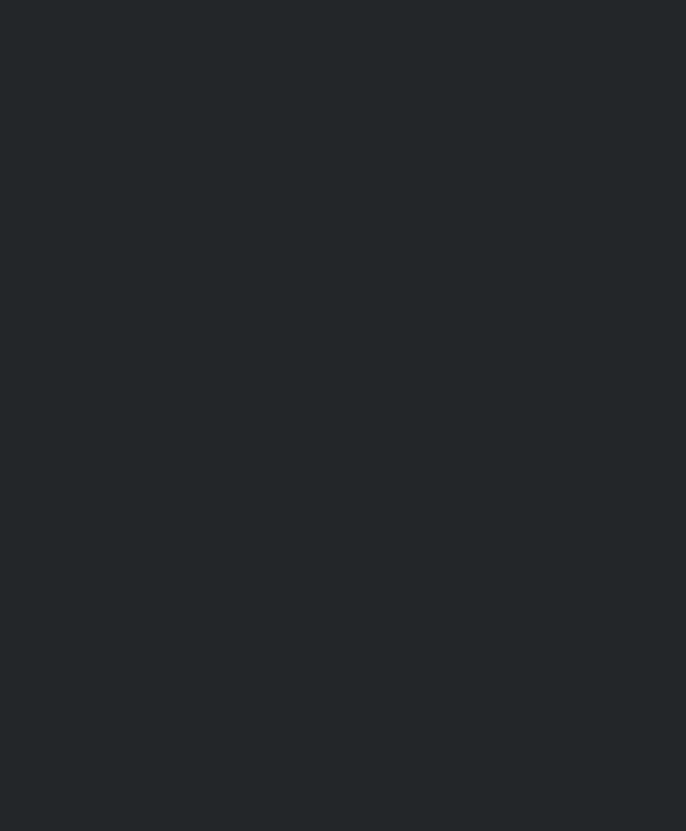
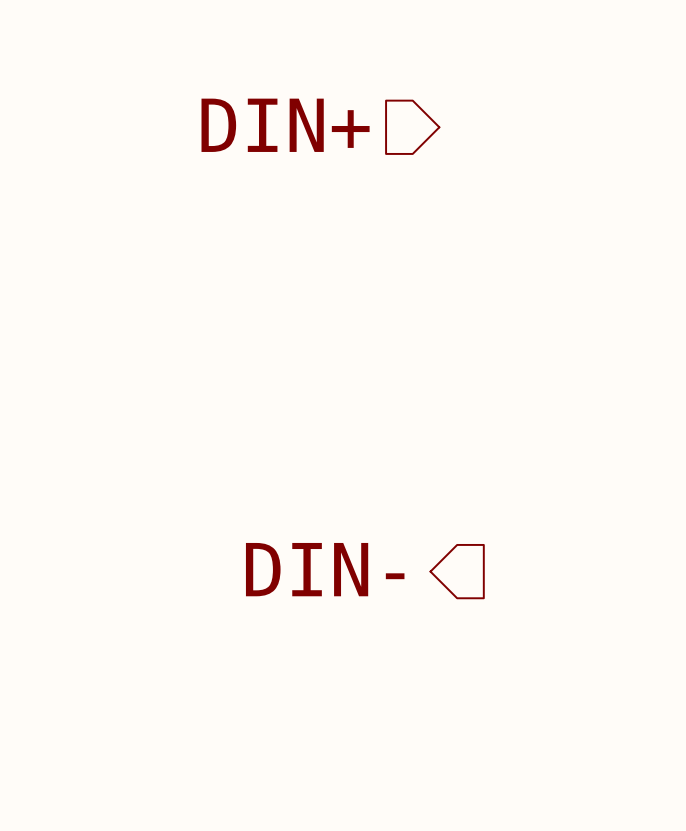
hierarchical label: none -> DIN+ (285, 125)
hierarchical label: none -> DIN- (325, 569)

